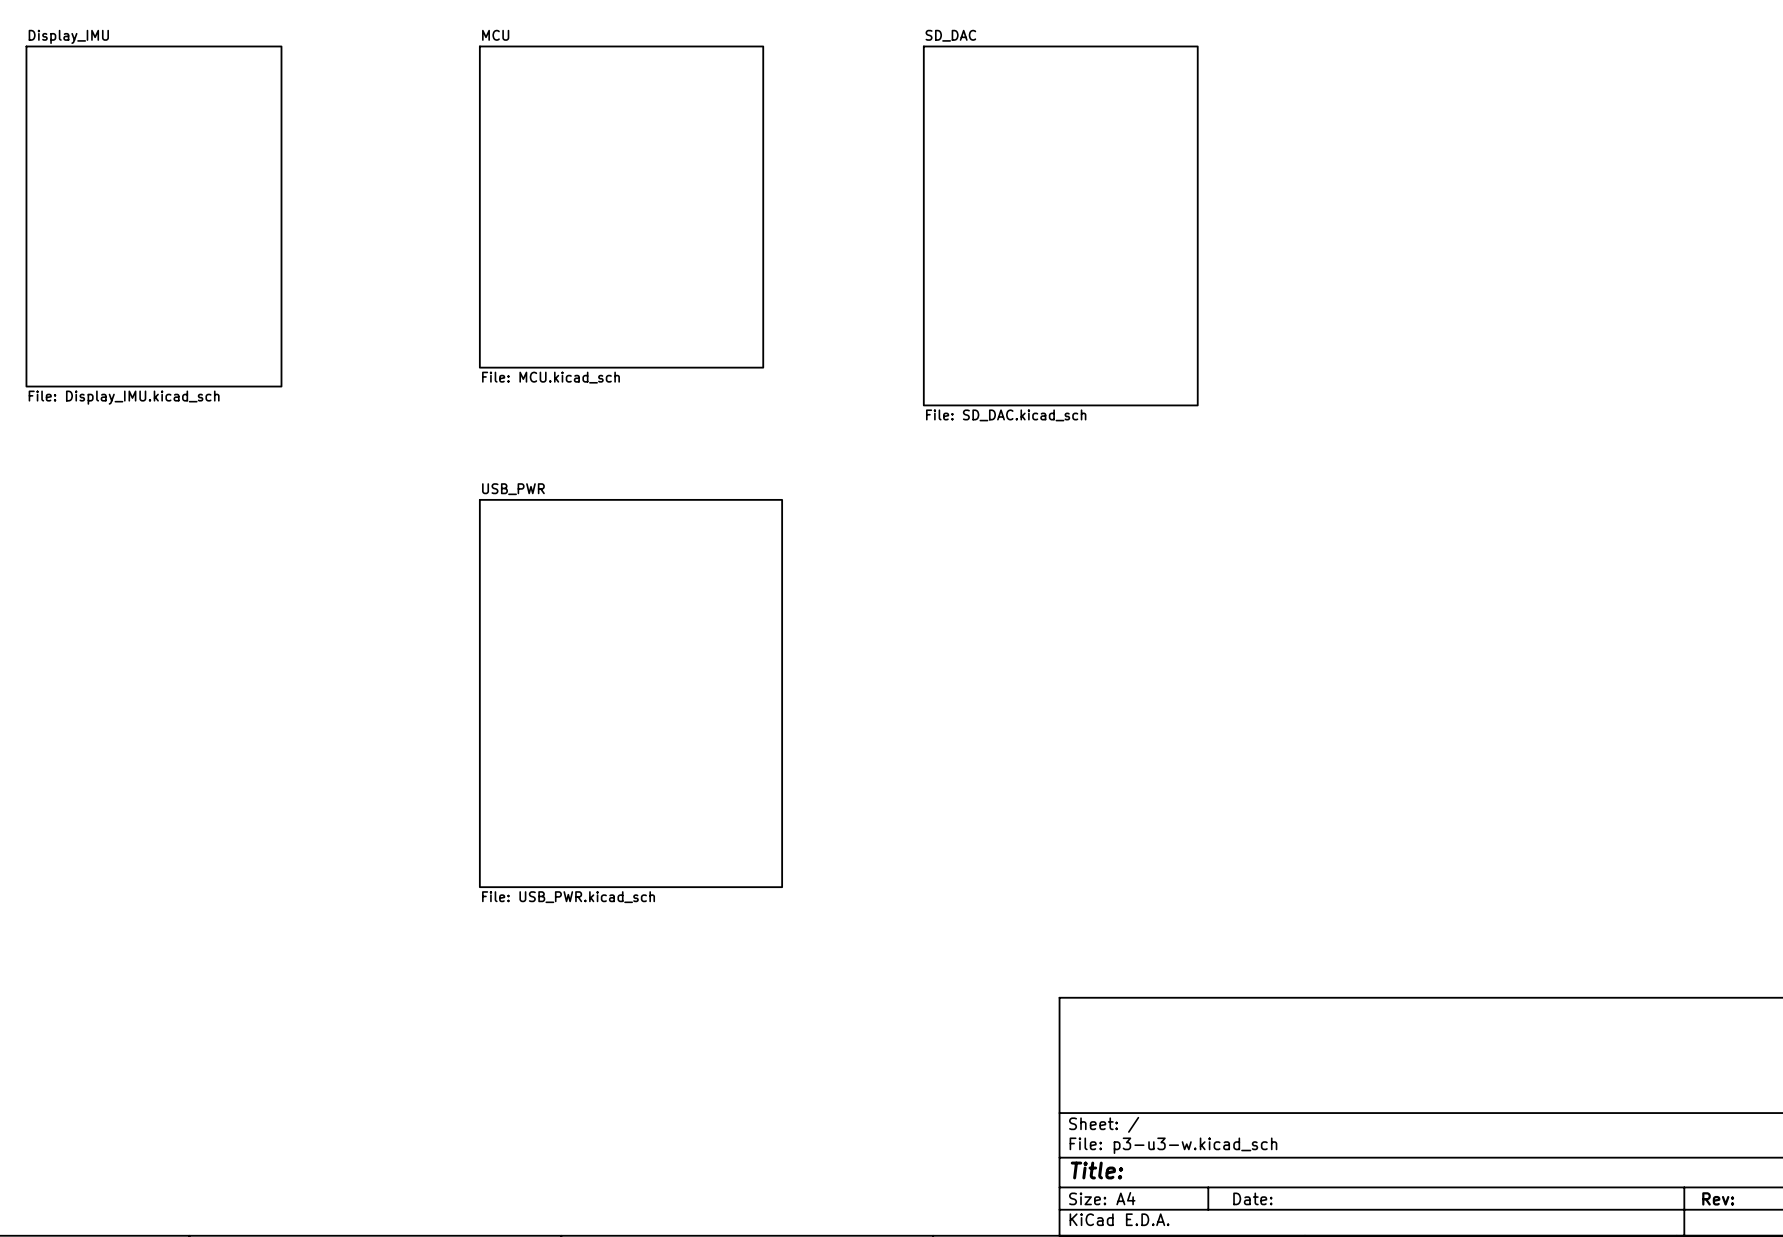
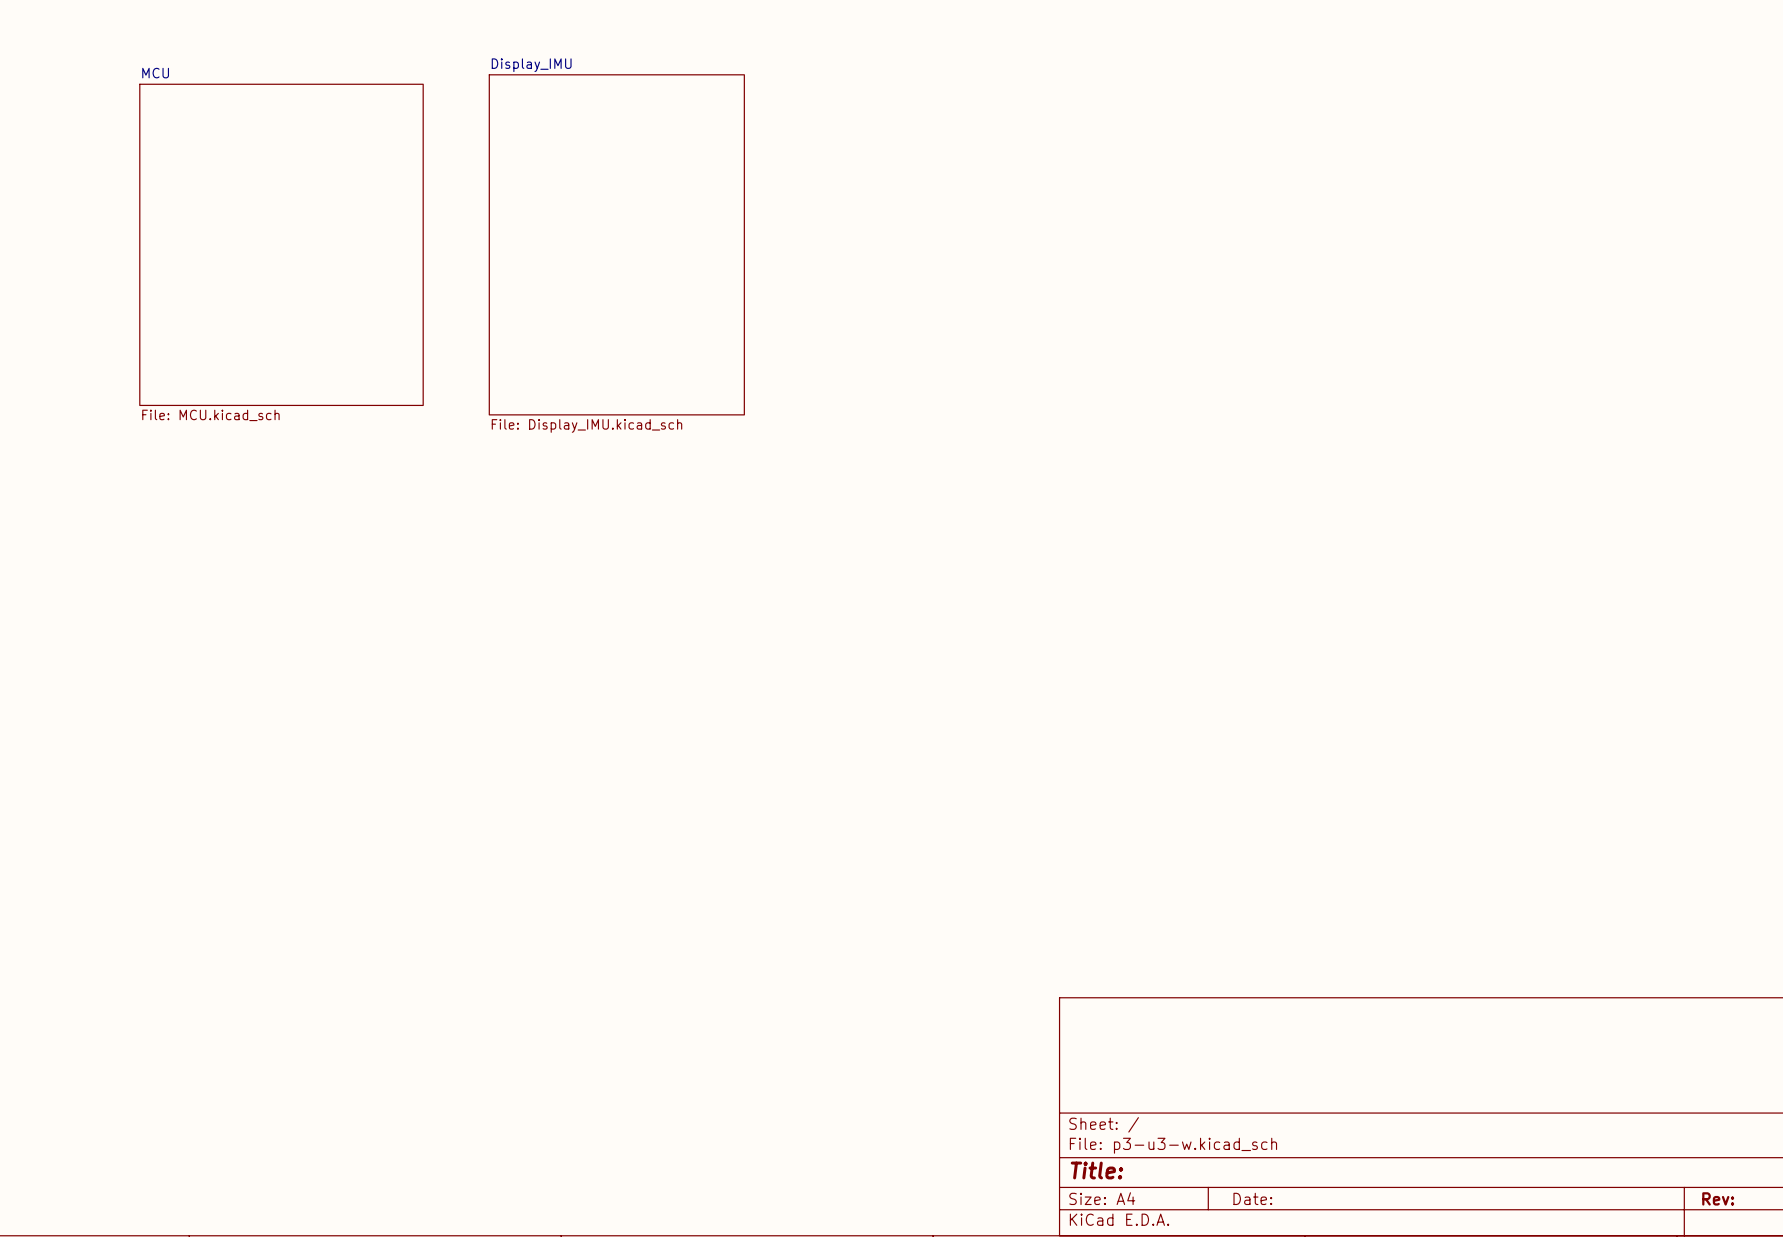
sheet MCU: File: MCU.kicad_sch (621, 207) -> none
sheet Display_IMU: File: Display_IMU.kicad_sch (153, 216) -> none
sheet SD_DAC: File: SD_DAC.kicad_sch (1060, 225) -> none
sheet MCU: none -> File: MCU.kicad_sch (281, 244)
sheet Display_IMU: none -> File: Display_IMU.kicad_sch (616, 244)
sheet USB_PWR: File: USB_PWR.kicad_sch (630, 693) -> none

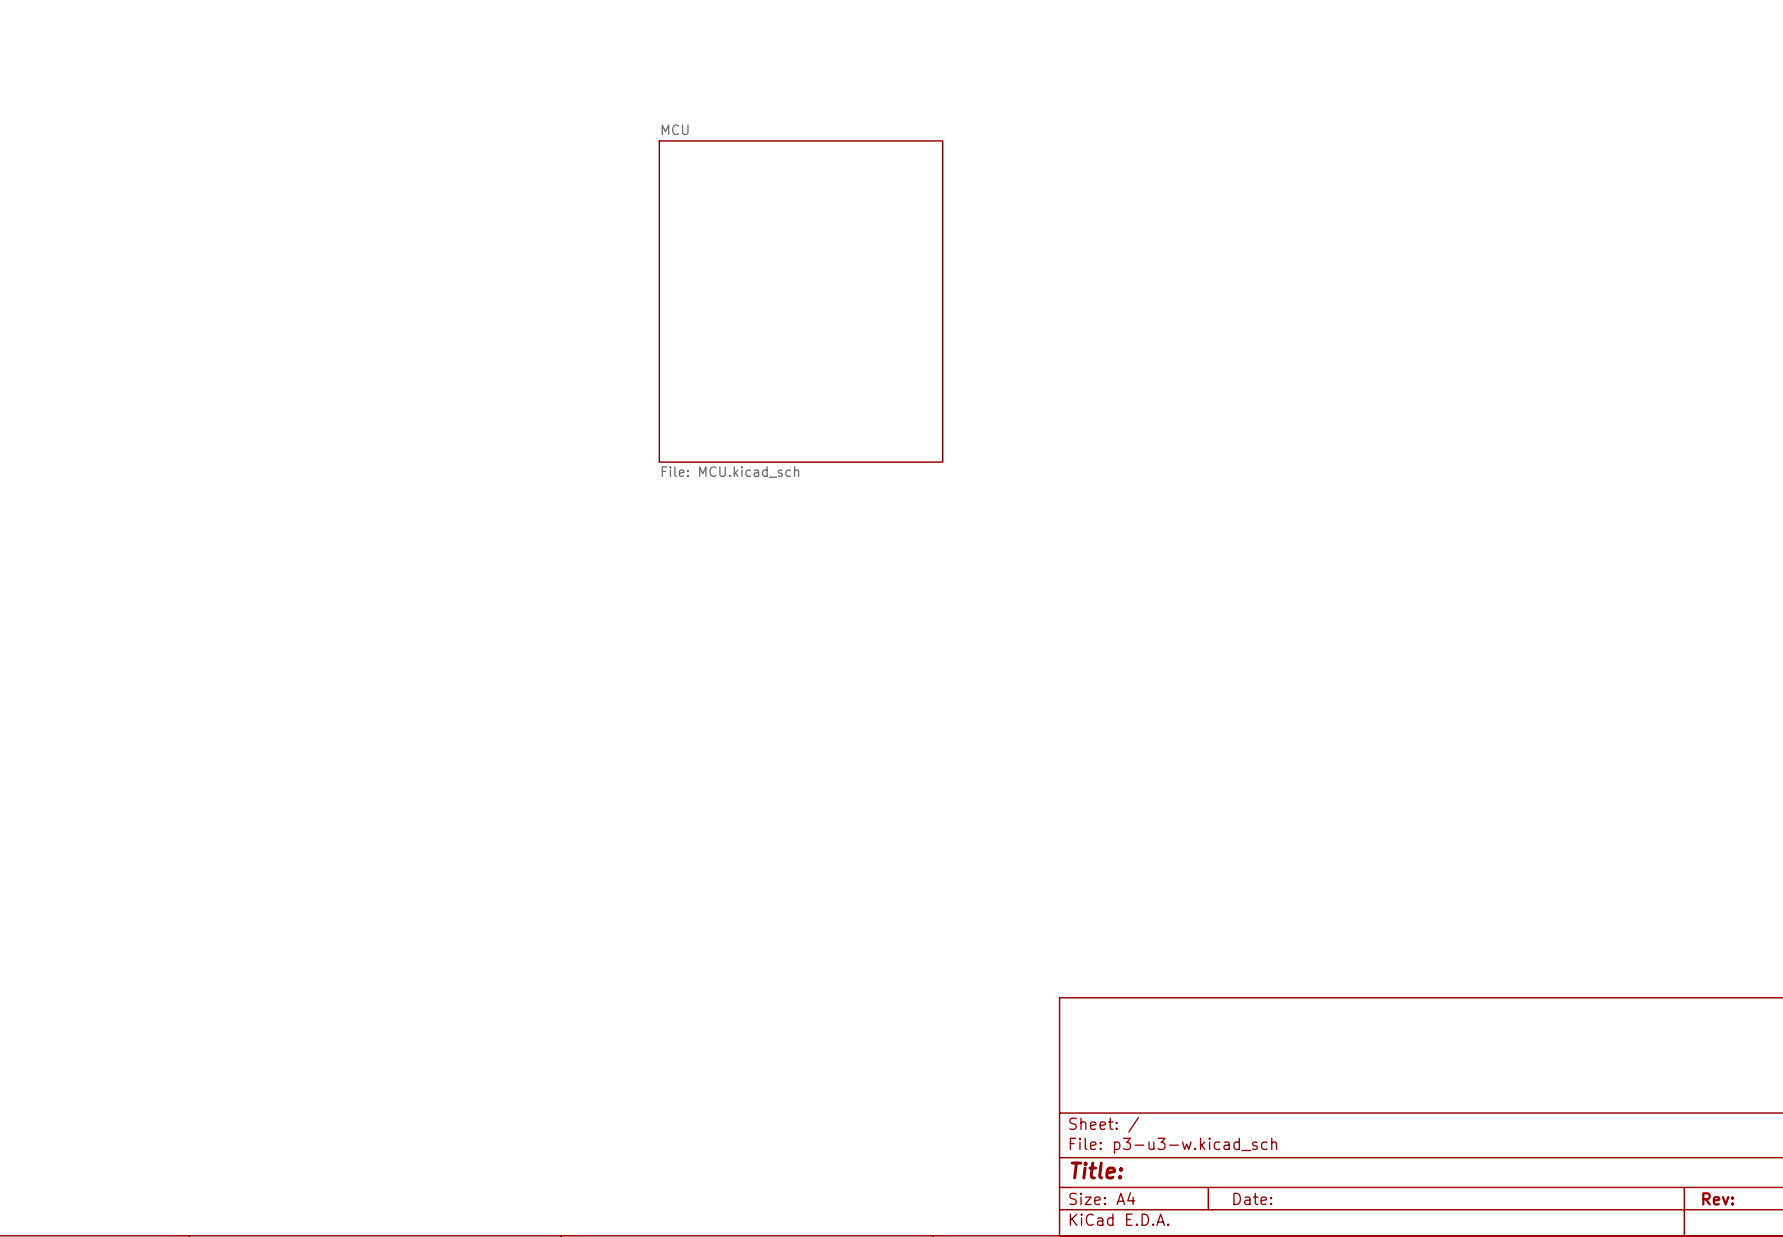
sheet MCU: File: MCU.kicad_sch (281, 244) -> none
sheet Display_IMU: File: Display_IMU.kicad_sch (616, 244) -> none
sheet MCU: none -> File: MCU.kicad_sch (801, 301)

